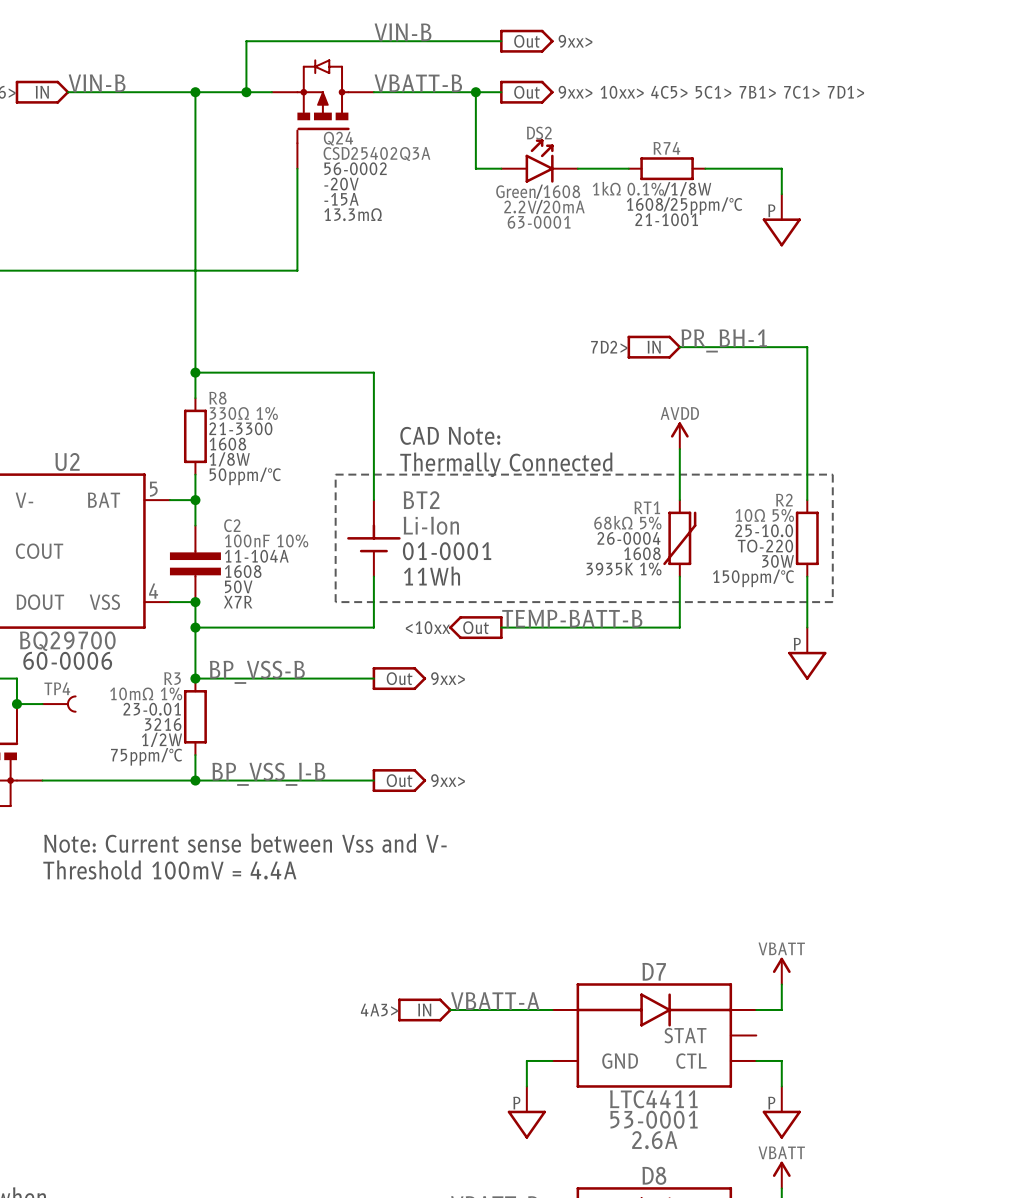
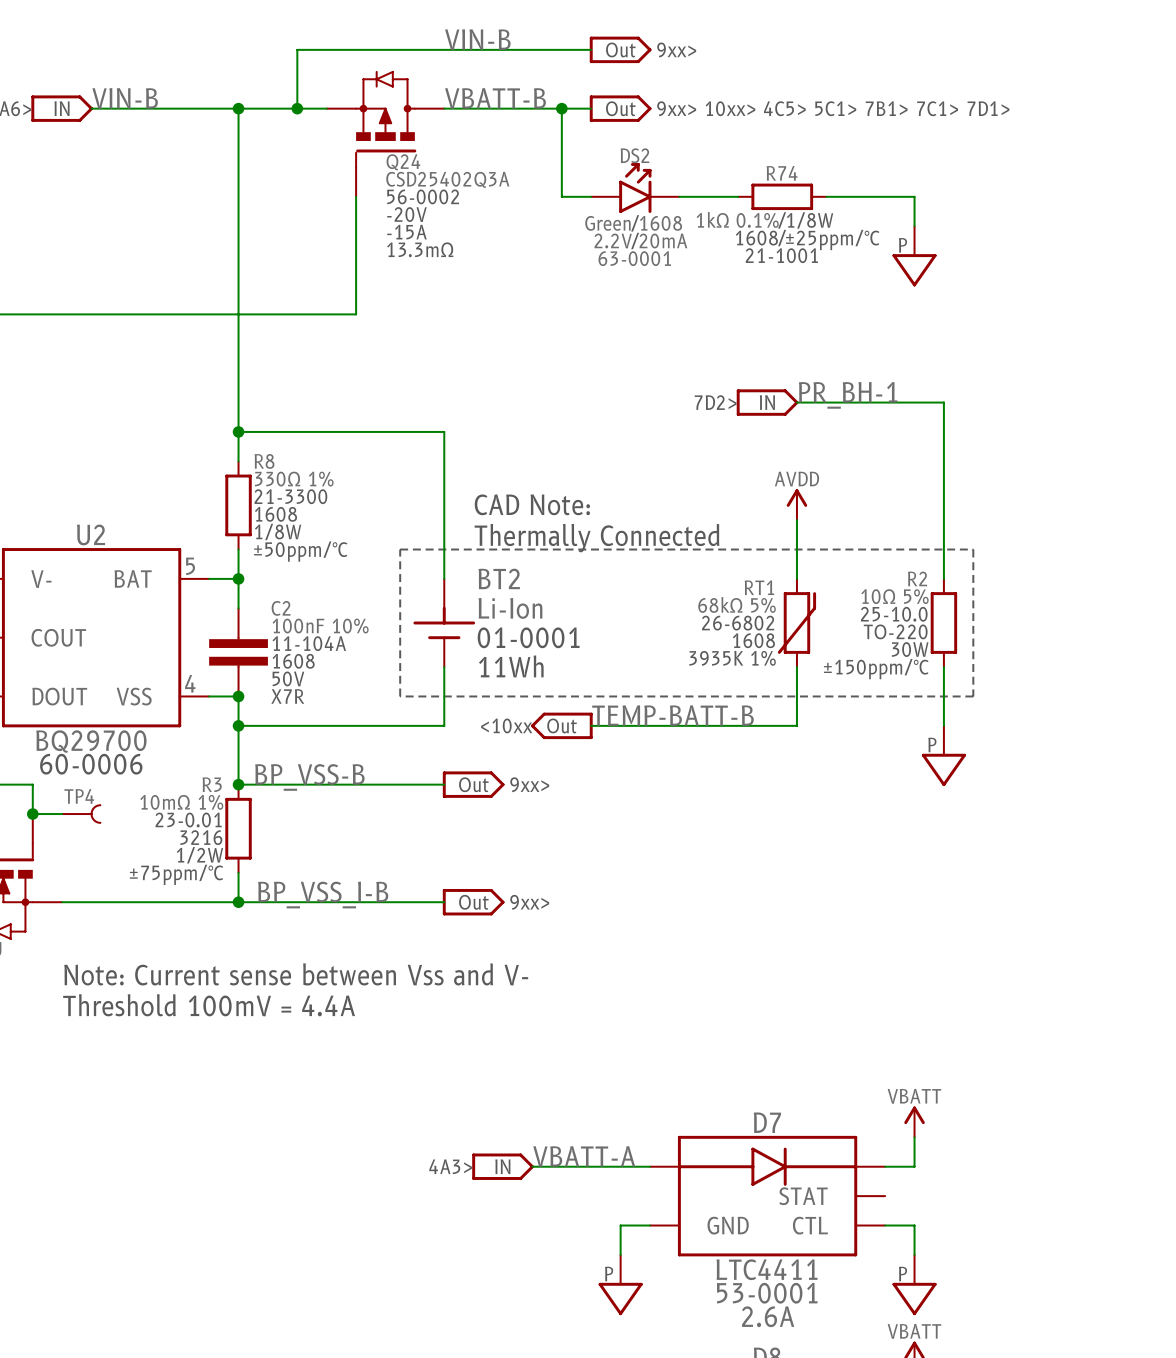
R74 text: 25ppm/°C (706, 206) -> ±25ppm/°C (832, 240)
R8 text: 50ppm/°C (245, 476) -> ±50ppm/°C (300, 551)
RT1 text: 26-0004 (628, 538) -> 26-6802 (738, 623)
R2 text: 150ppm/°C (753, 578) -> ±150ppm/°C (876, 669)
R3 text: 75ppm/°C (146, 756) -> ±75ppm/°C (176, 874)

